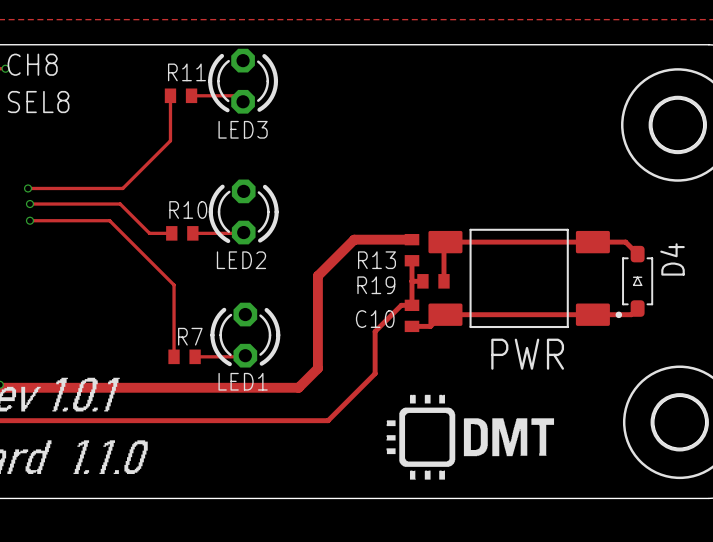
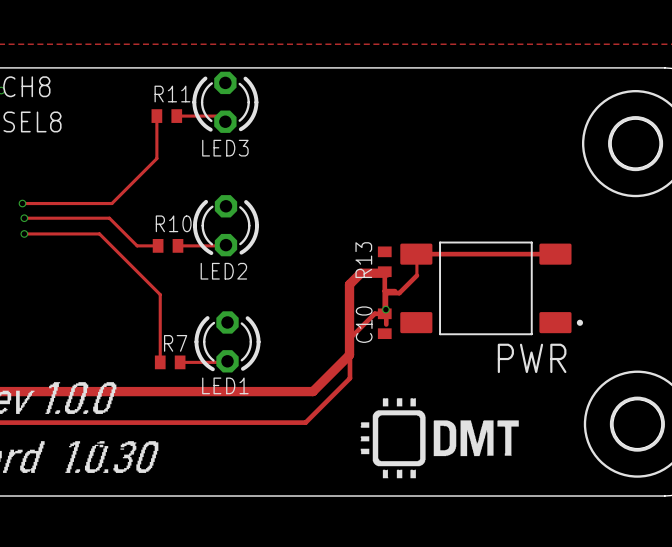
track: (412, 239) (354, 239) (317, 275) (317, 368) (298, 387) -> (386, 273) (360, 273) (349, 284) (349, 355) (312, 391) (277, 391)
track: (445, 242) (443, 281) -> (416, 254) (416, 275) (399, 293) (385, 293) (386, 324)
track: (592, 242) (625, 242) (637, 254) -> none
R13 name rotation: 0° (376, 260) -> 90° counterclockwise (363, 260)
R19: (433, 281) -> none
D4: (637, 281) -> none
via: none -> (385, 309)
track: (637, 308) (631, 314) (442, 314) (430, 326) (412, 326) -> none
C10 name rotation: 0° (375, 319) -> 90° counterclockwise (364, 324)
PWR name position: PWR (527, 354) -> PWR (532, 358)
drawing: none -> [93, 382, 117, 414]
drawing: [104, 377, 120, 412] -> none
drawing: none -> [84, 441, 159, 473]
drawing: [99, 440, 148, 475] -> none
drawing position: (141, 442) -> (152, 442)
drawing position: (109, 443) -> (127, 457)

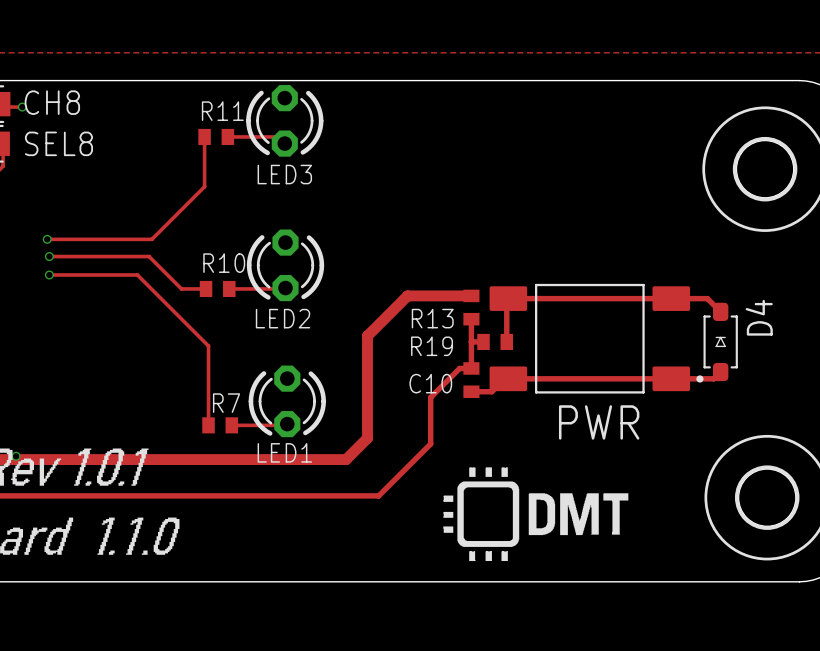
track: (416, 254) (416, 275) (399, 293) (385, 293) (386, 324) -> (508, 298) (506, 300) (506, 341)
track: none -> (671, 298) (707, 298) (720, 311)
R13 name rotation: 0° (363, 260) -> 90° clockwise (432, 318)
track: (386, 273) (360, 273) (349, 284) (349, 355) (312, 391) (277, 391) -> (471, 295) (407, 295) (367, 336) (367, 438) (346, 459)
R19: none -> (495, 341)
D4: none -> (720, 341)
via: (385, 309) -> none
track: none -> (720, 372) (713, 378) (504, 378) (491, 391) (471, 391)
C10 name rotation: 0° (364, 324) -> 90° clockwise (430, 383)
PWR name position: PWR (532, 358) -> PWR (599, 422)
drawing: [93, 382, 117, 414] -> none
drawing: none -> [131, 448, 149, 486]
drawing: [84, 441, 159, 473] -> none
drawing: none -> [126, 517, 180, 555]
drawing position: (152, 442) -> (172, 519)
drawing position: (127, 457) -> (136, 521)

